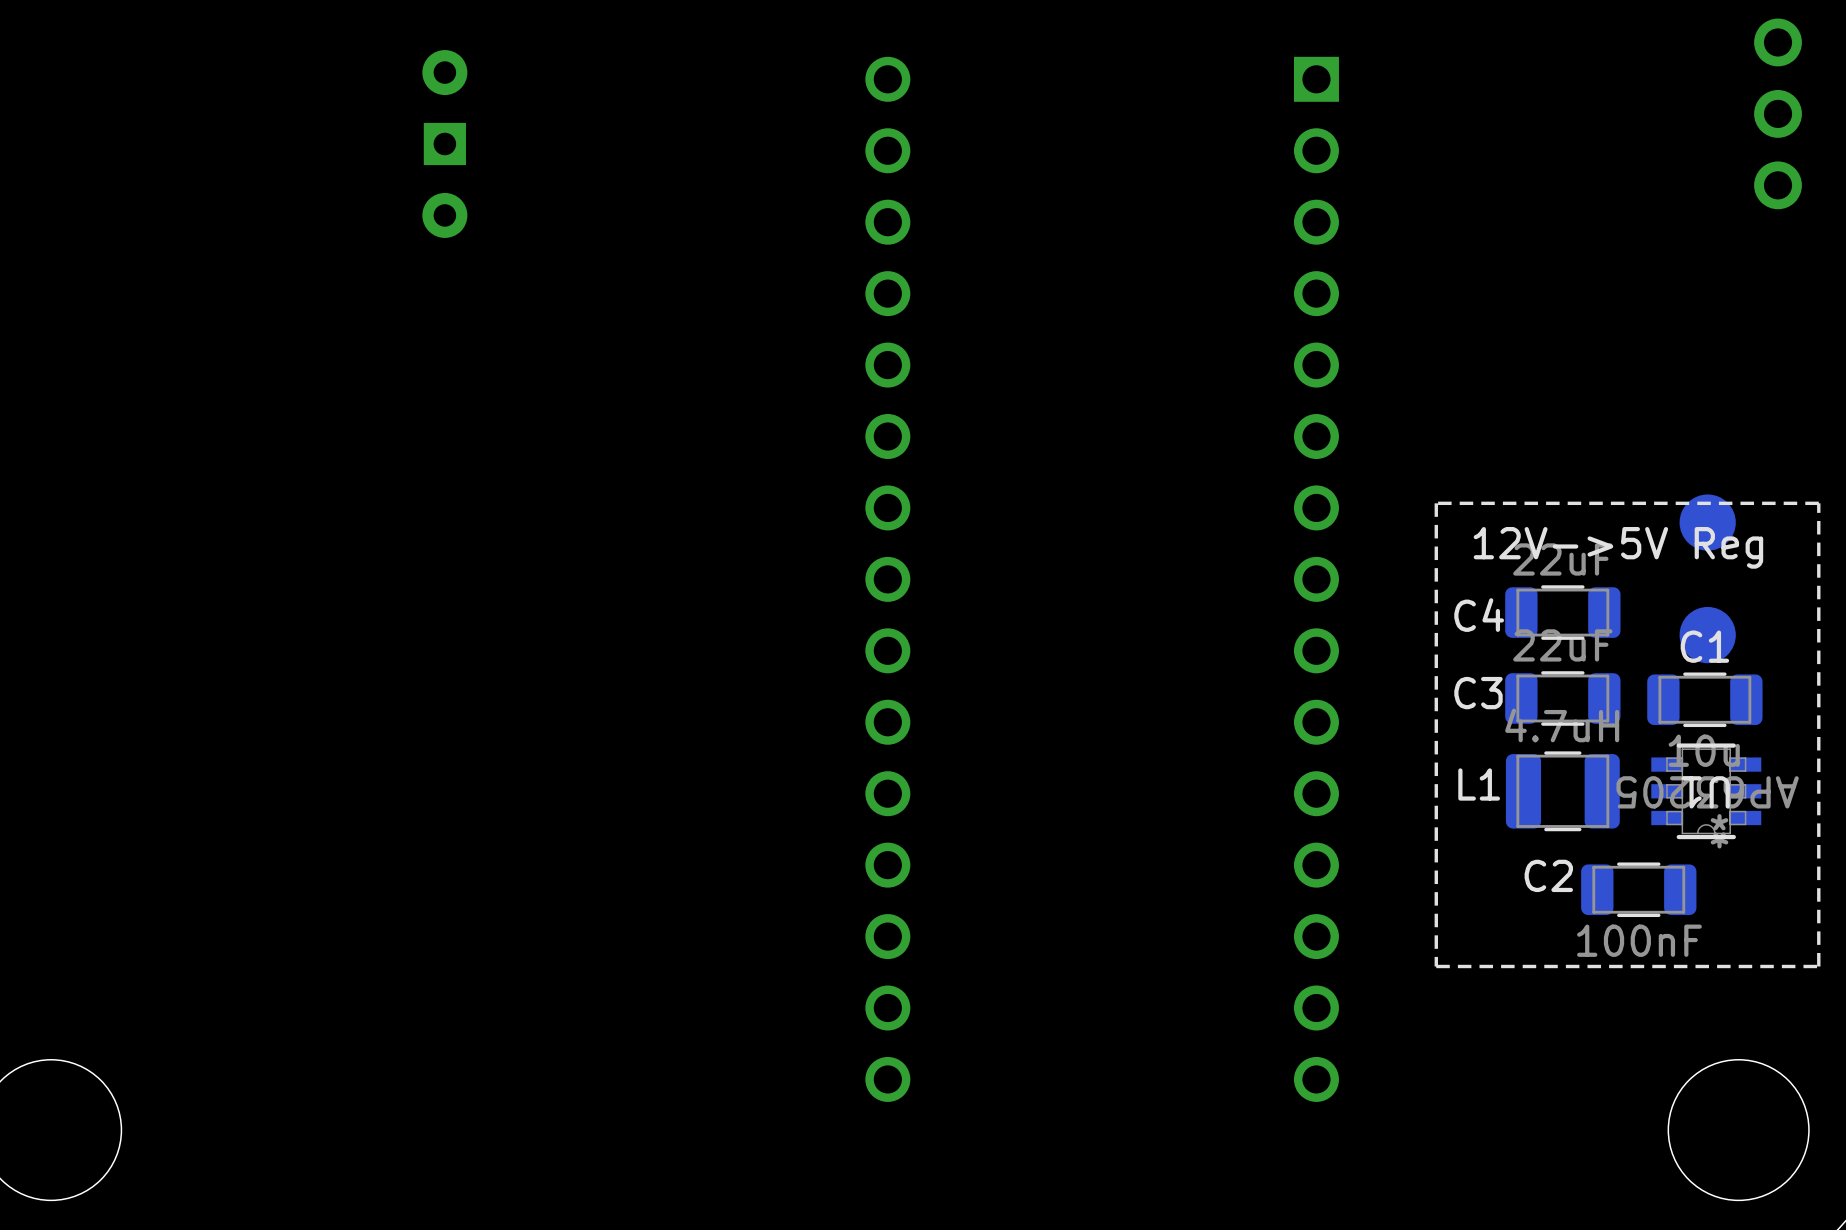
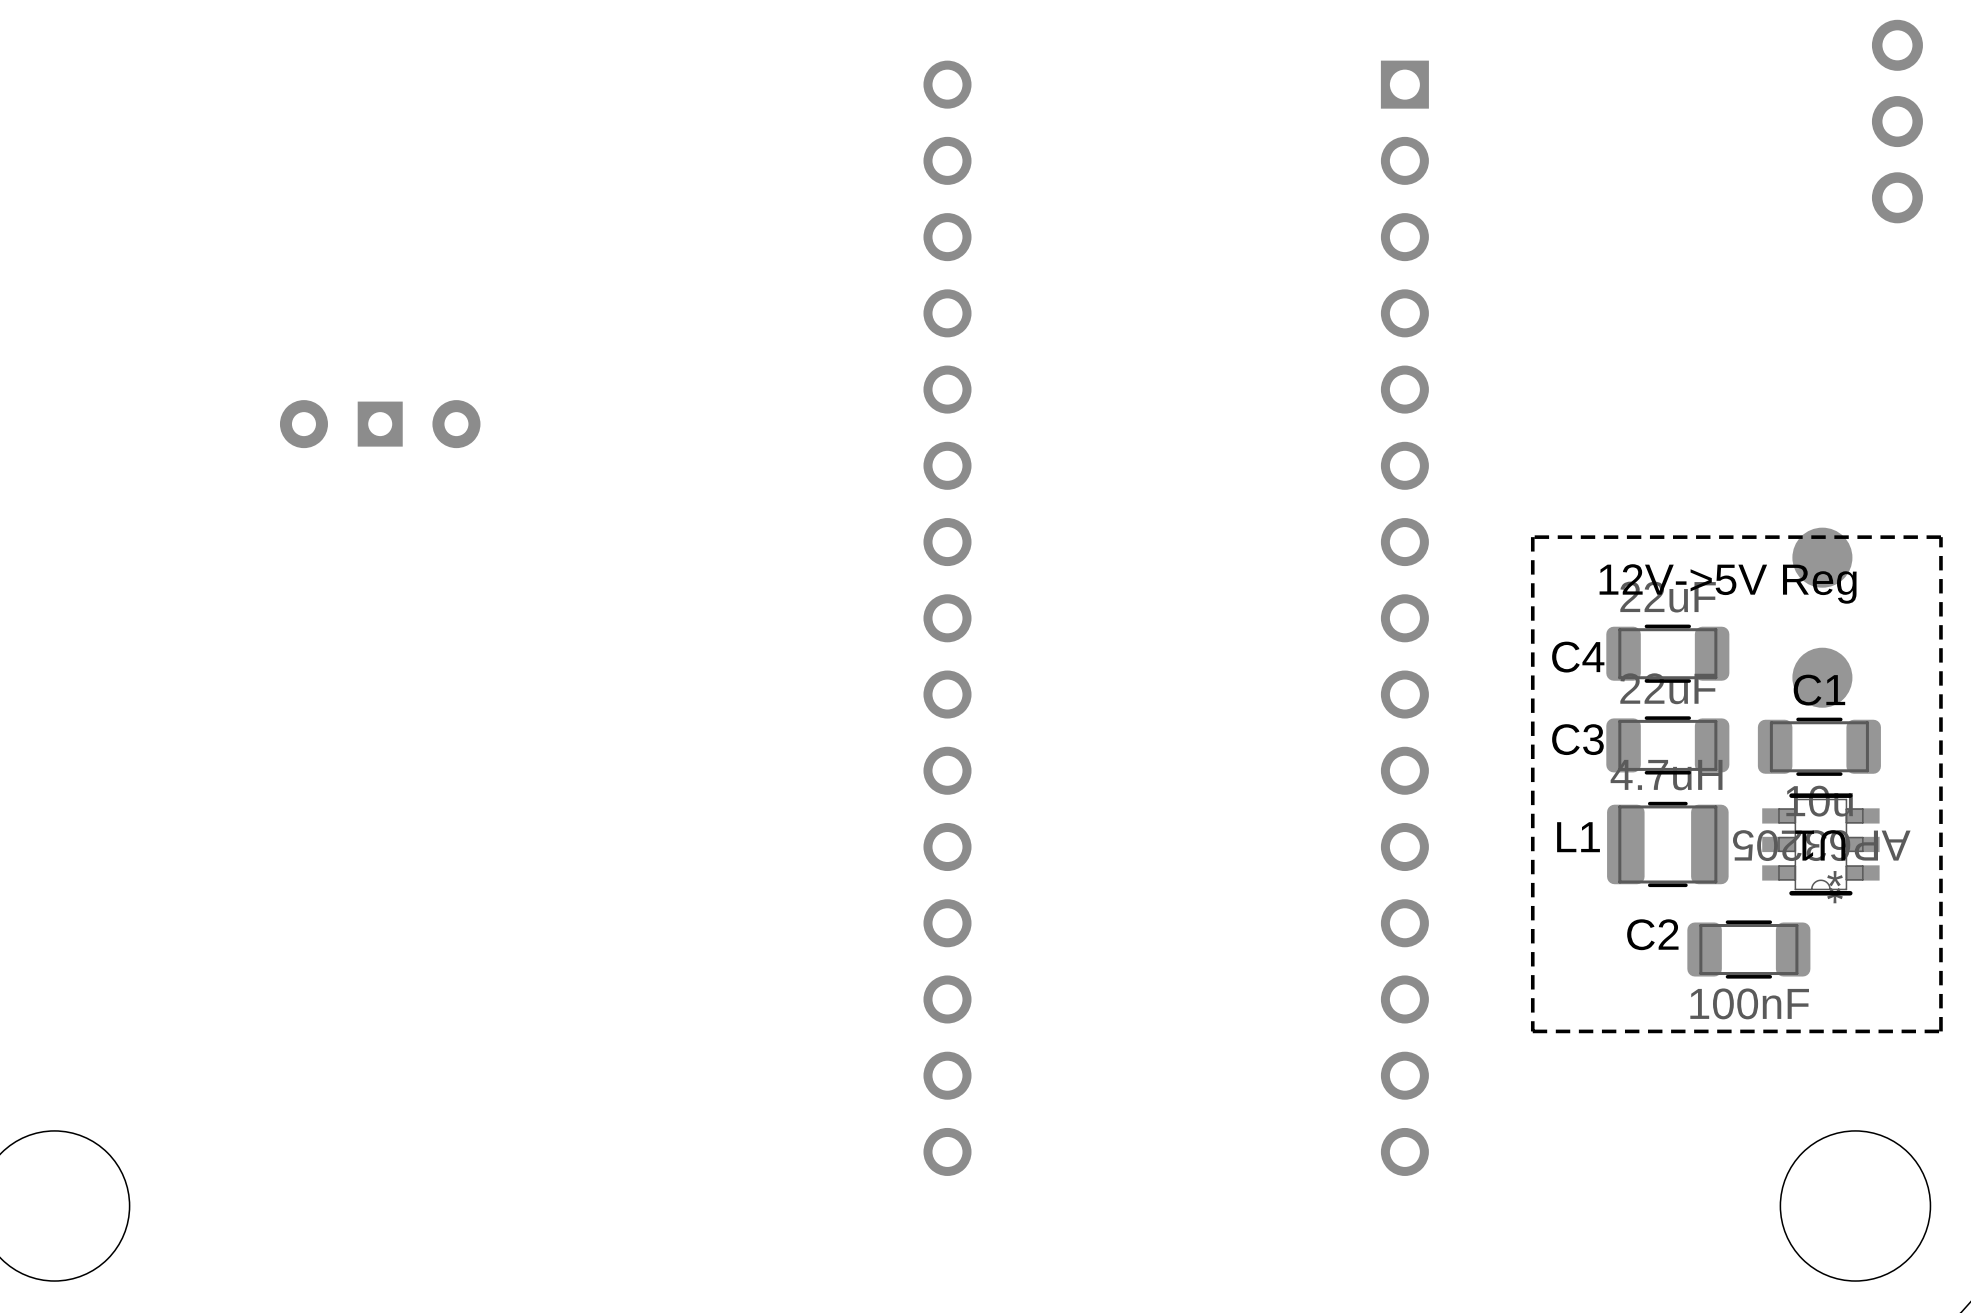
part rotation: 0° (444, 144) -> 90° clockwise (380, 424)
part position: (444, 144) -> (380, 424)

